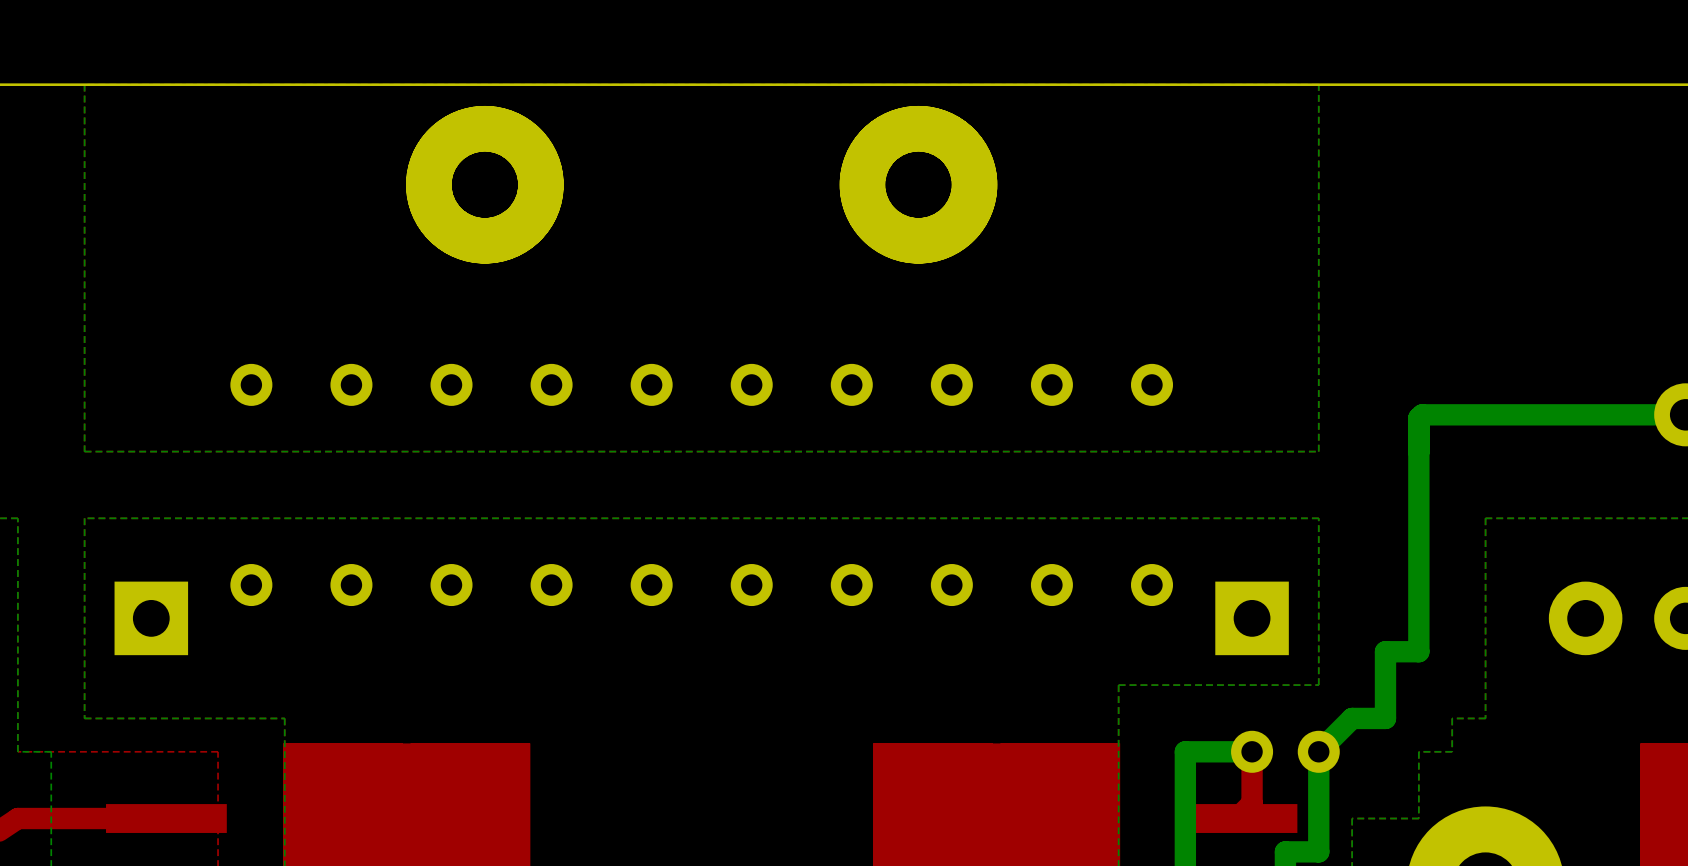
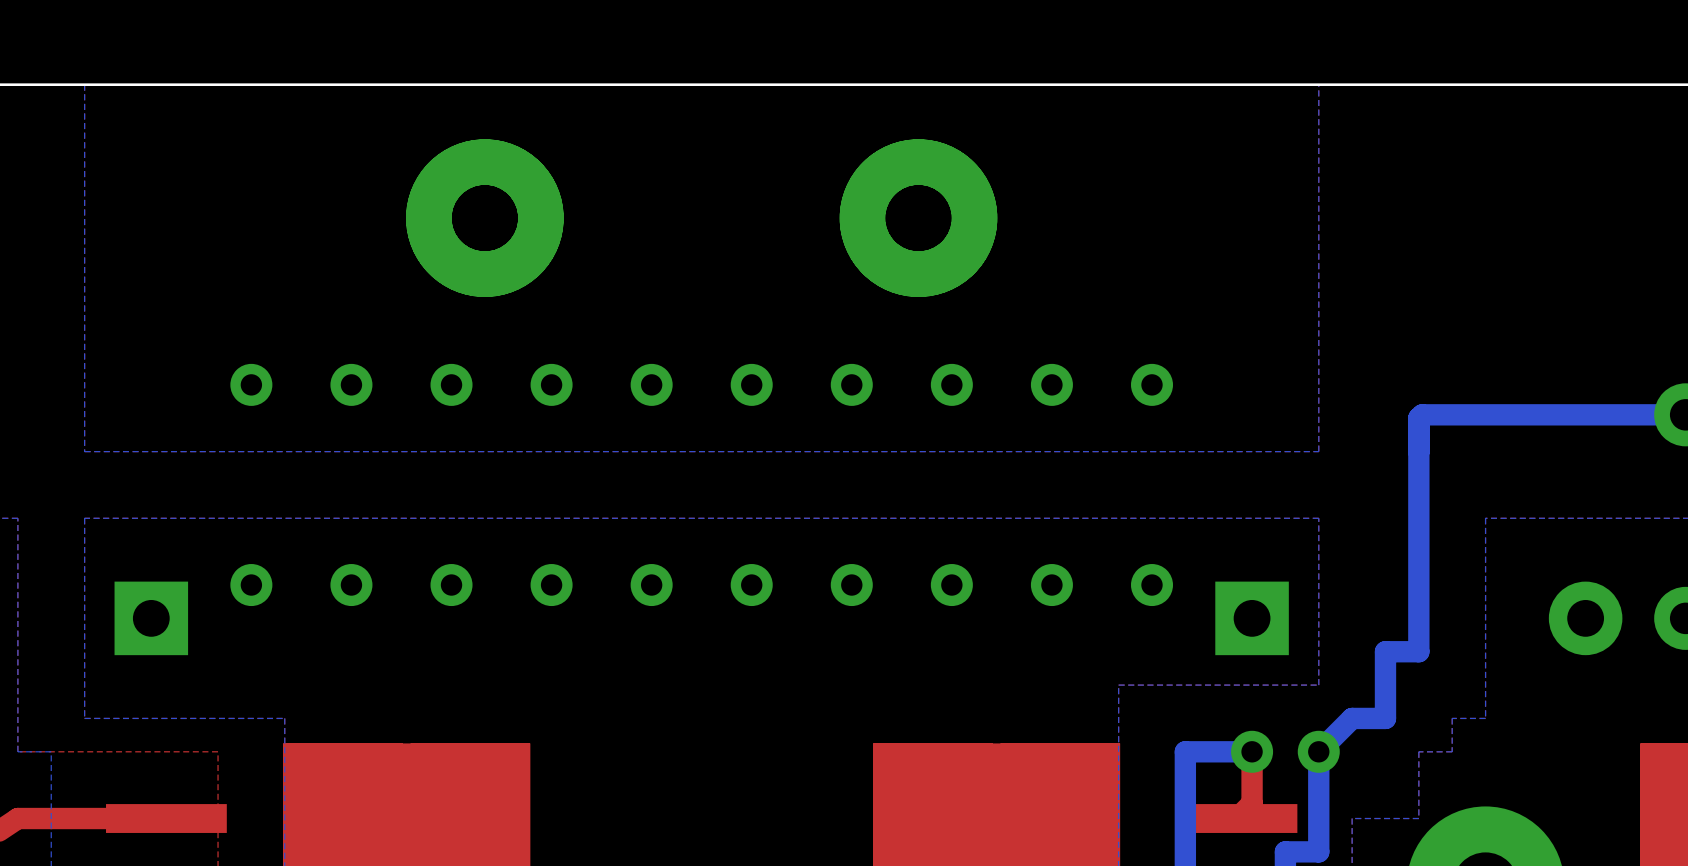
part position: (484, 184) -> (484, 218)
part position: (918, 184) -> (918, 218)

